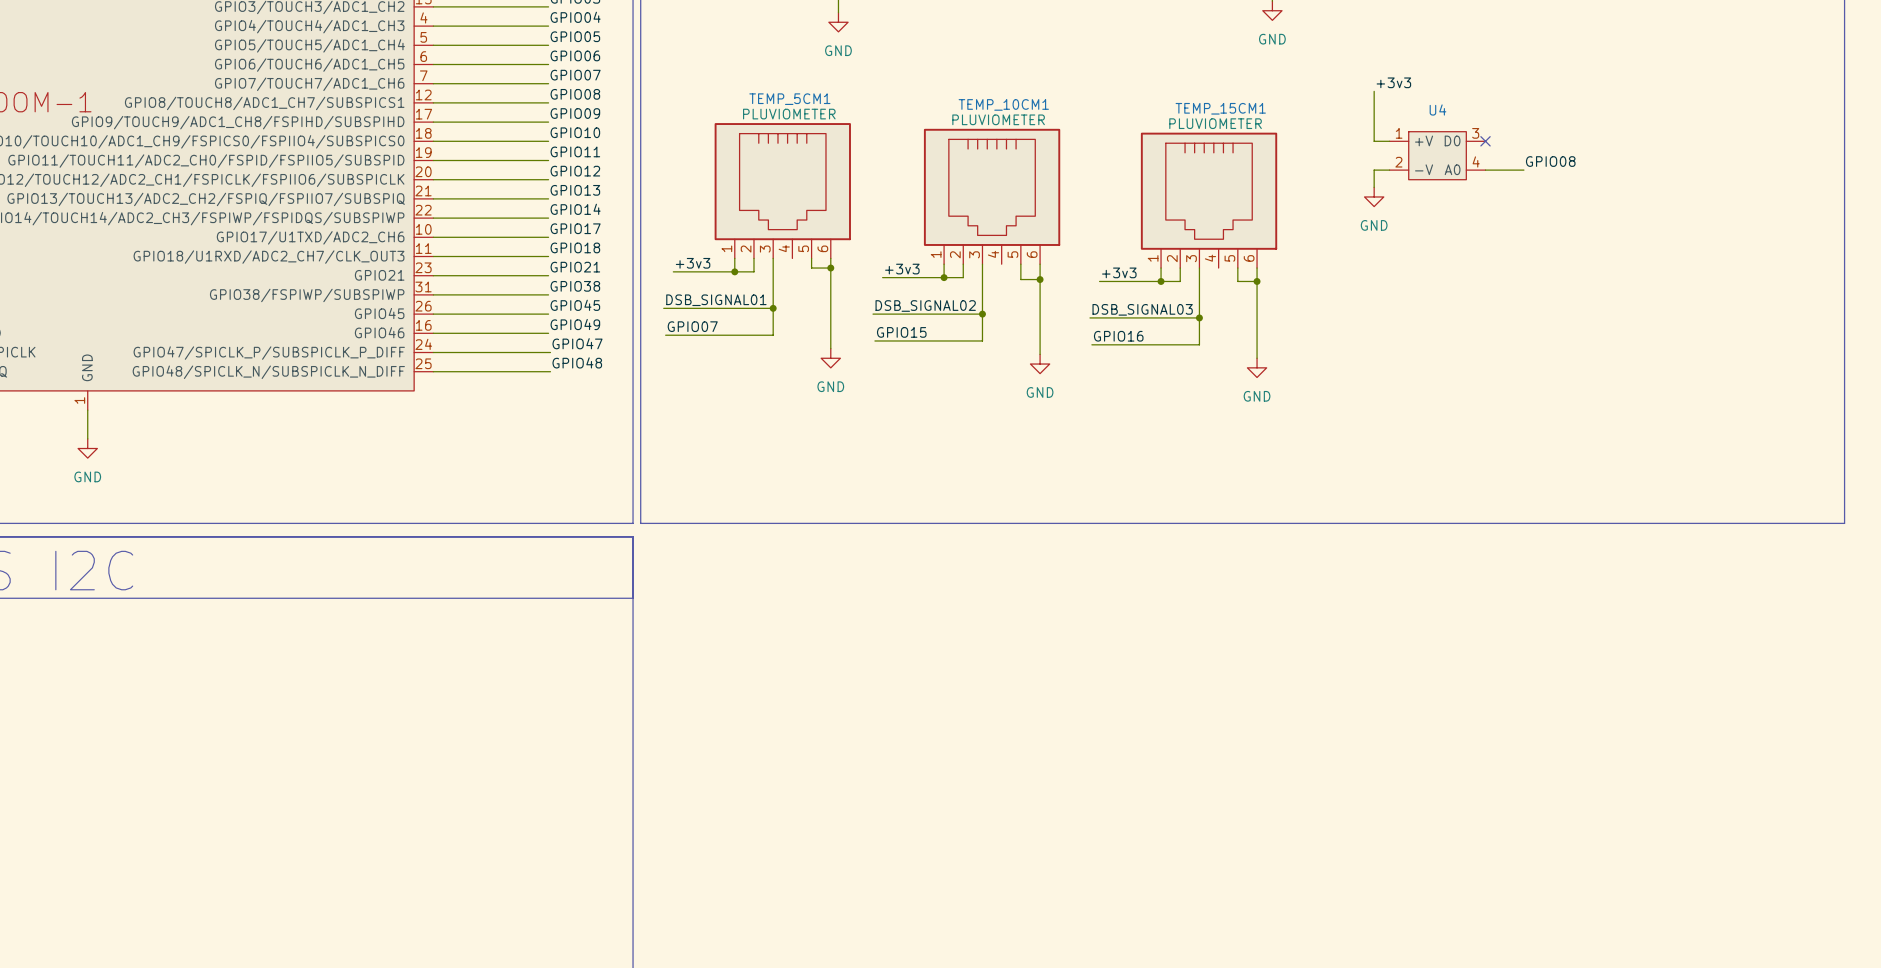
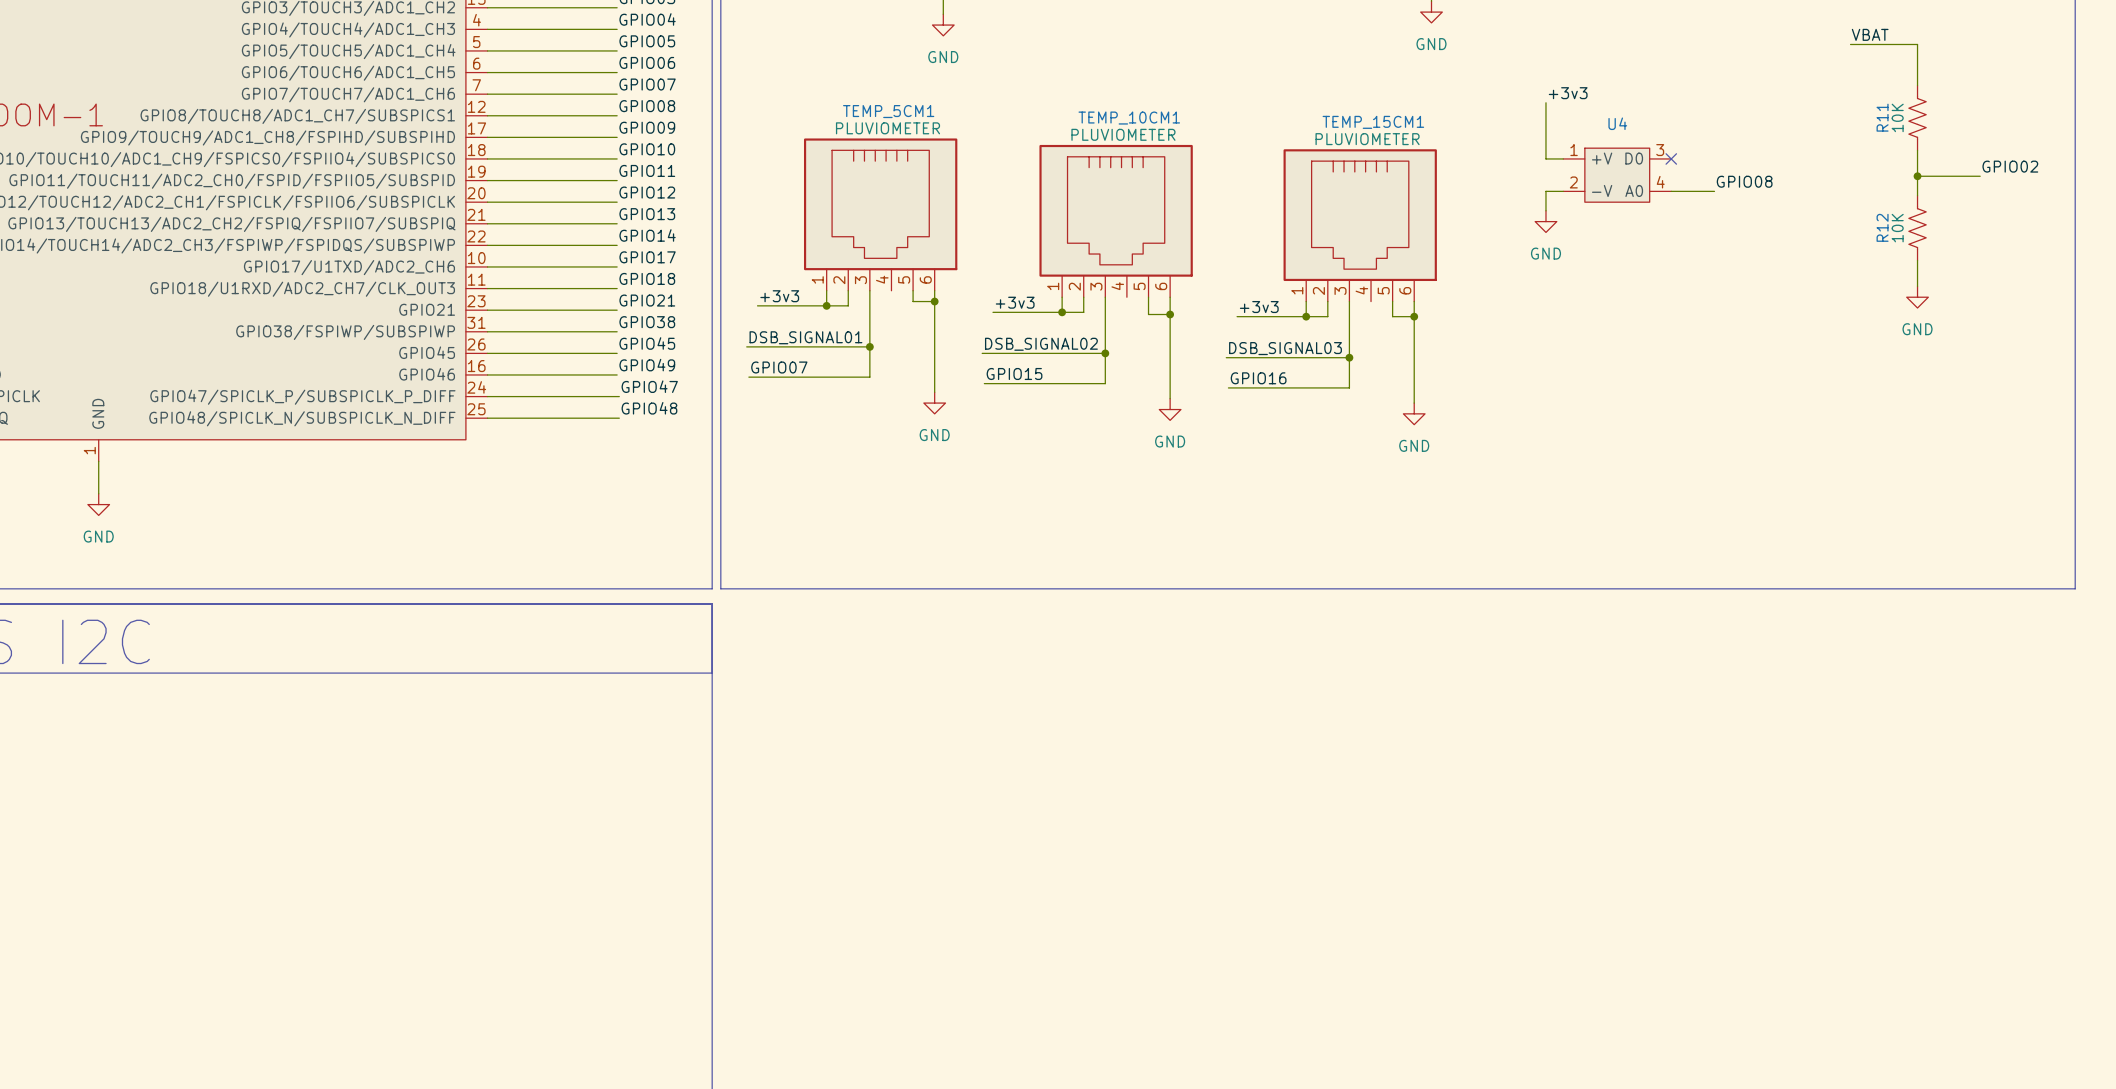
label: none -> VBAT (1870, 34)
wire: none -> (1850, 44) (1917, 44) (1917, 85)
R11: none -> 10K (1917, 117)
wire: none -> (1917, 150) (1917, 195)
label: none -> GPIO02 (2010, 166)
wire: none -> (1917, 176) (1980, 176)
junction: none -> (1917, 176)
R12: none -> 10K (1917, 228)
wire: none -> (1917, 260) (1917, 286)
power symbol: none -> GND (1917, 297)

